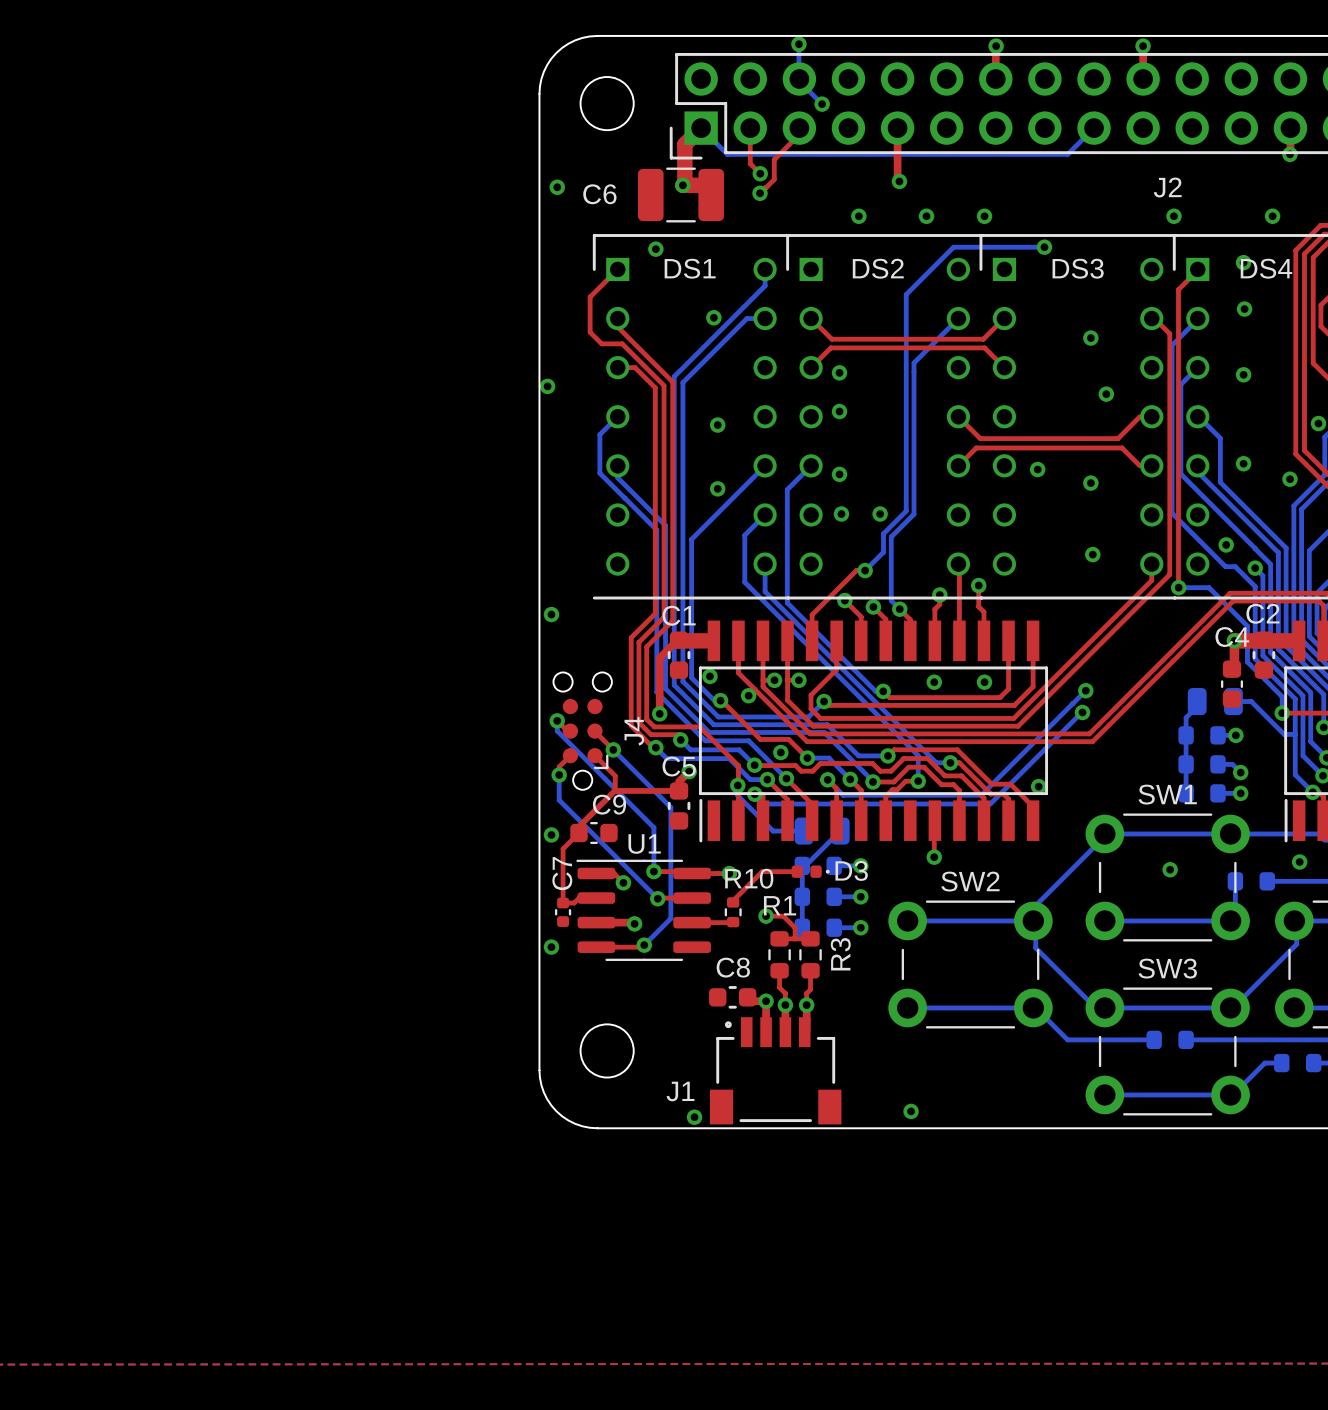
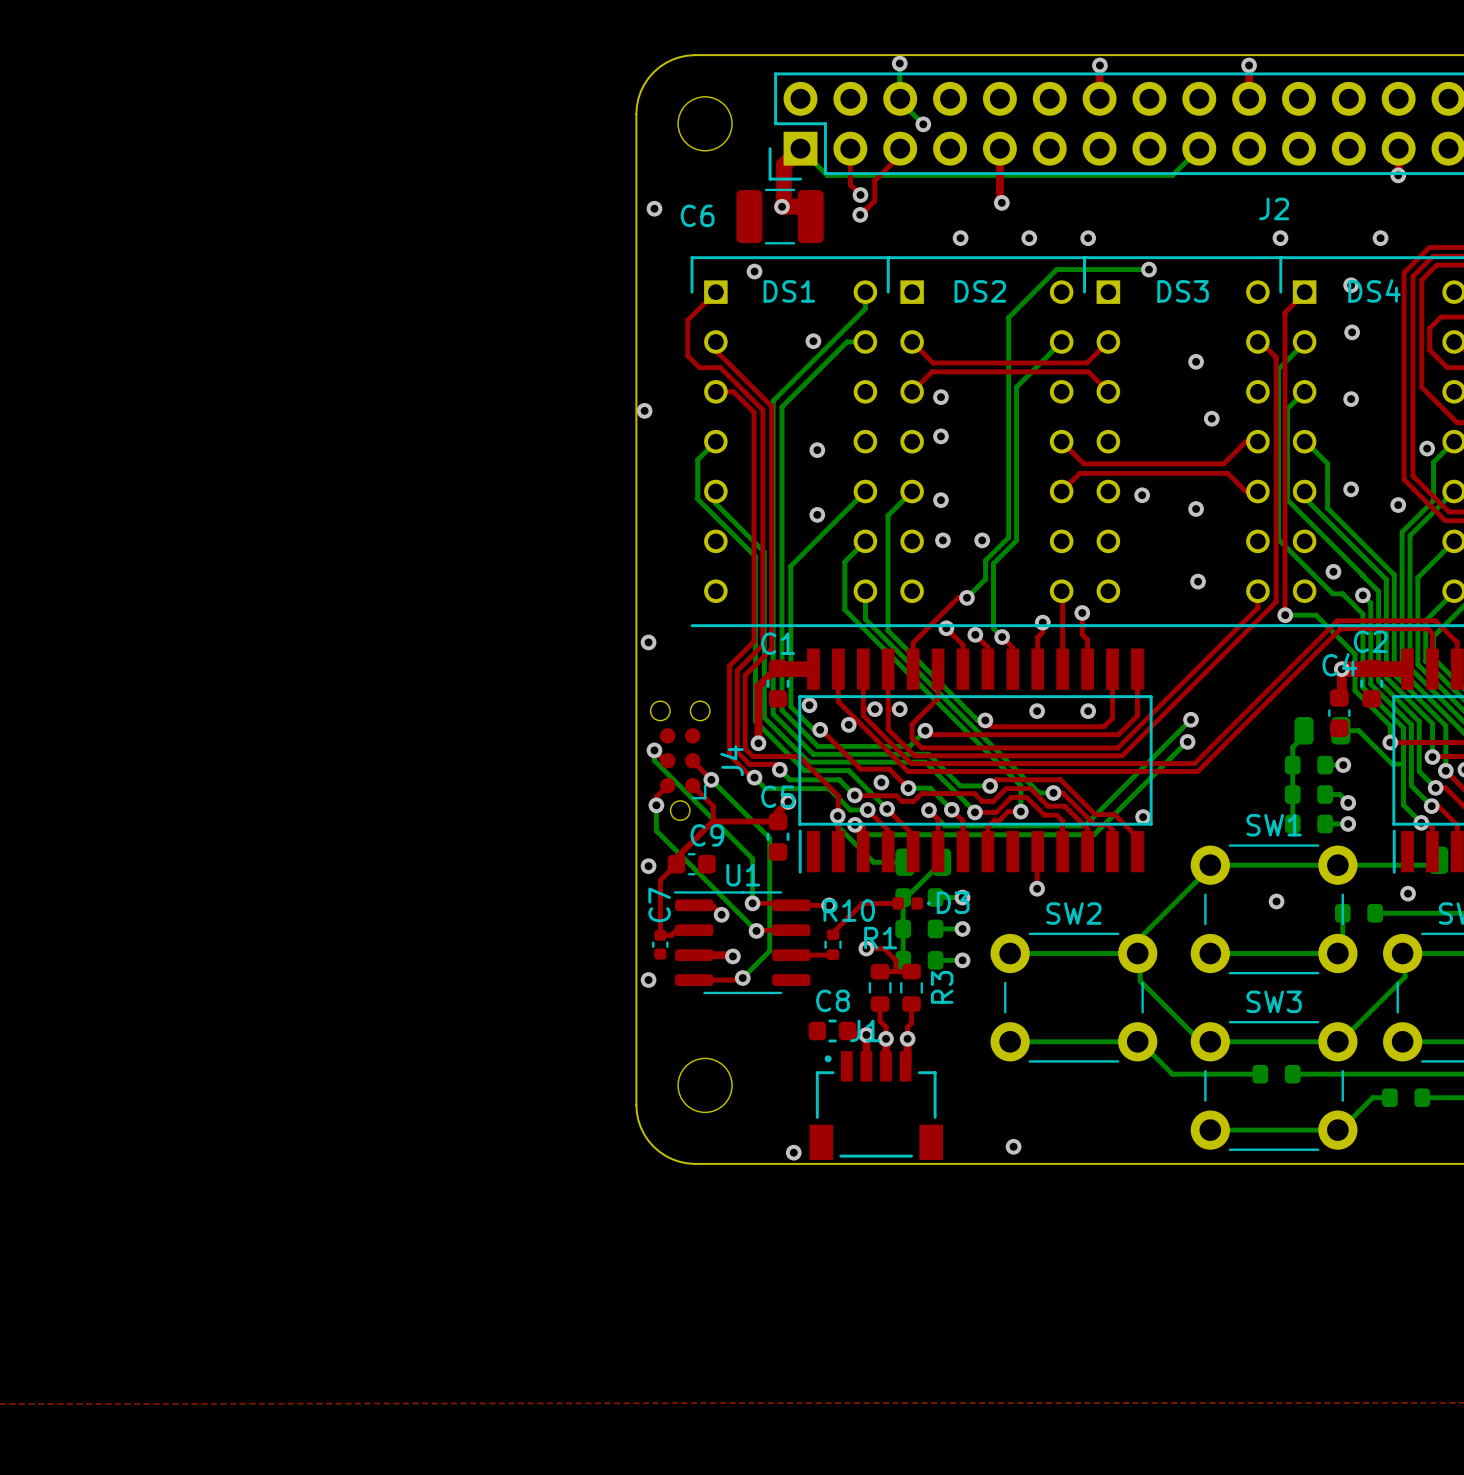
J1 name position: J1 (680, 1091) -> J1 (865, 1030)

